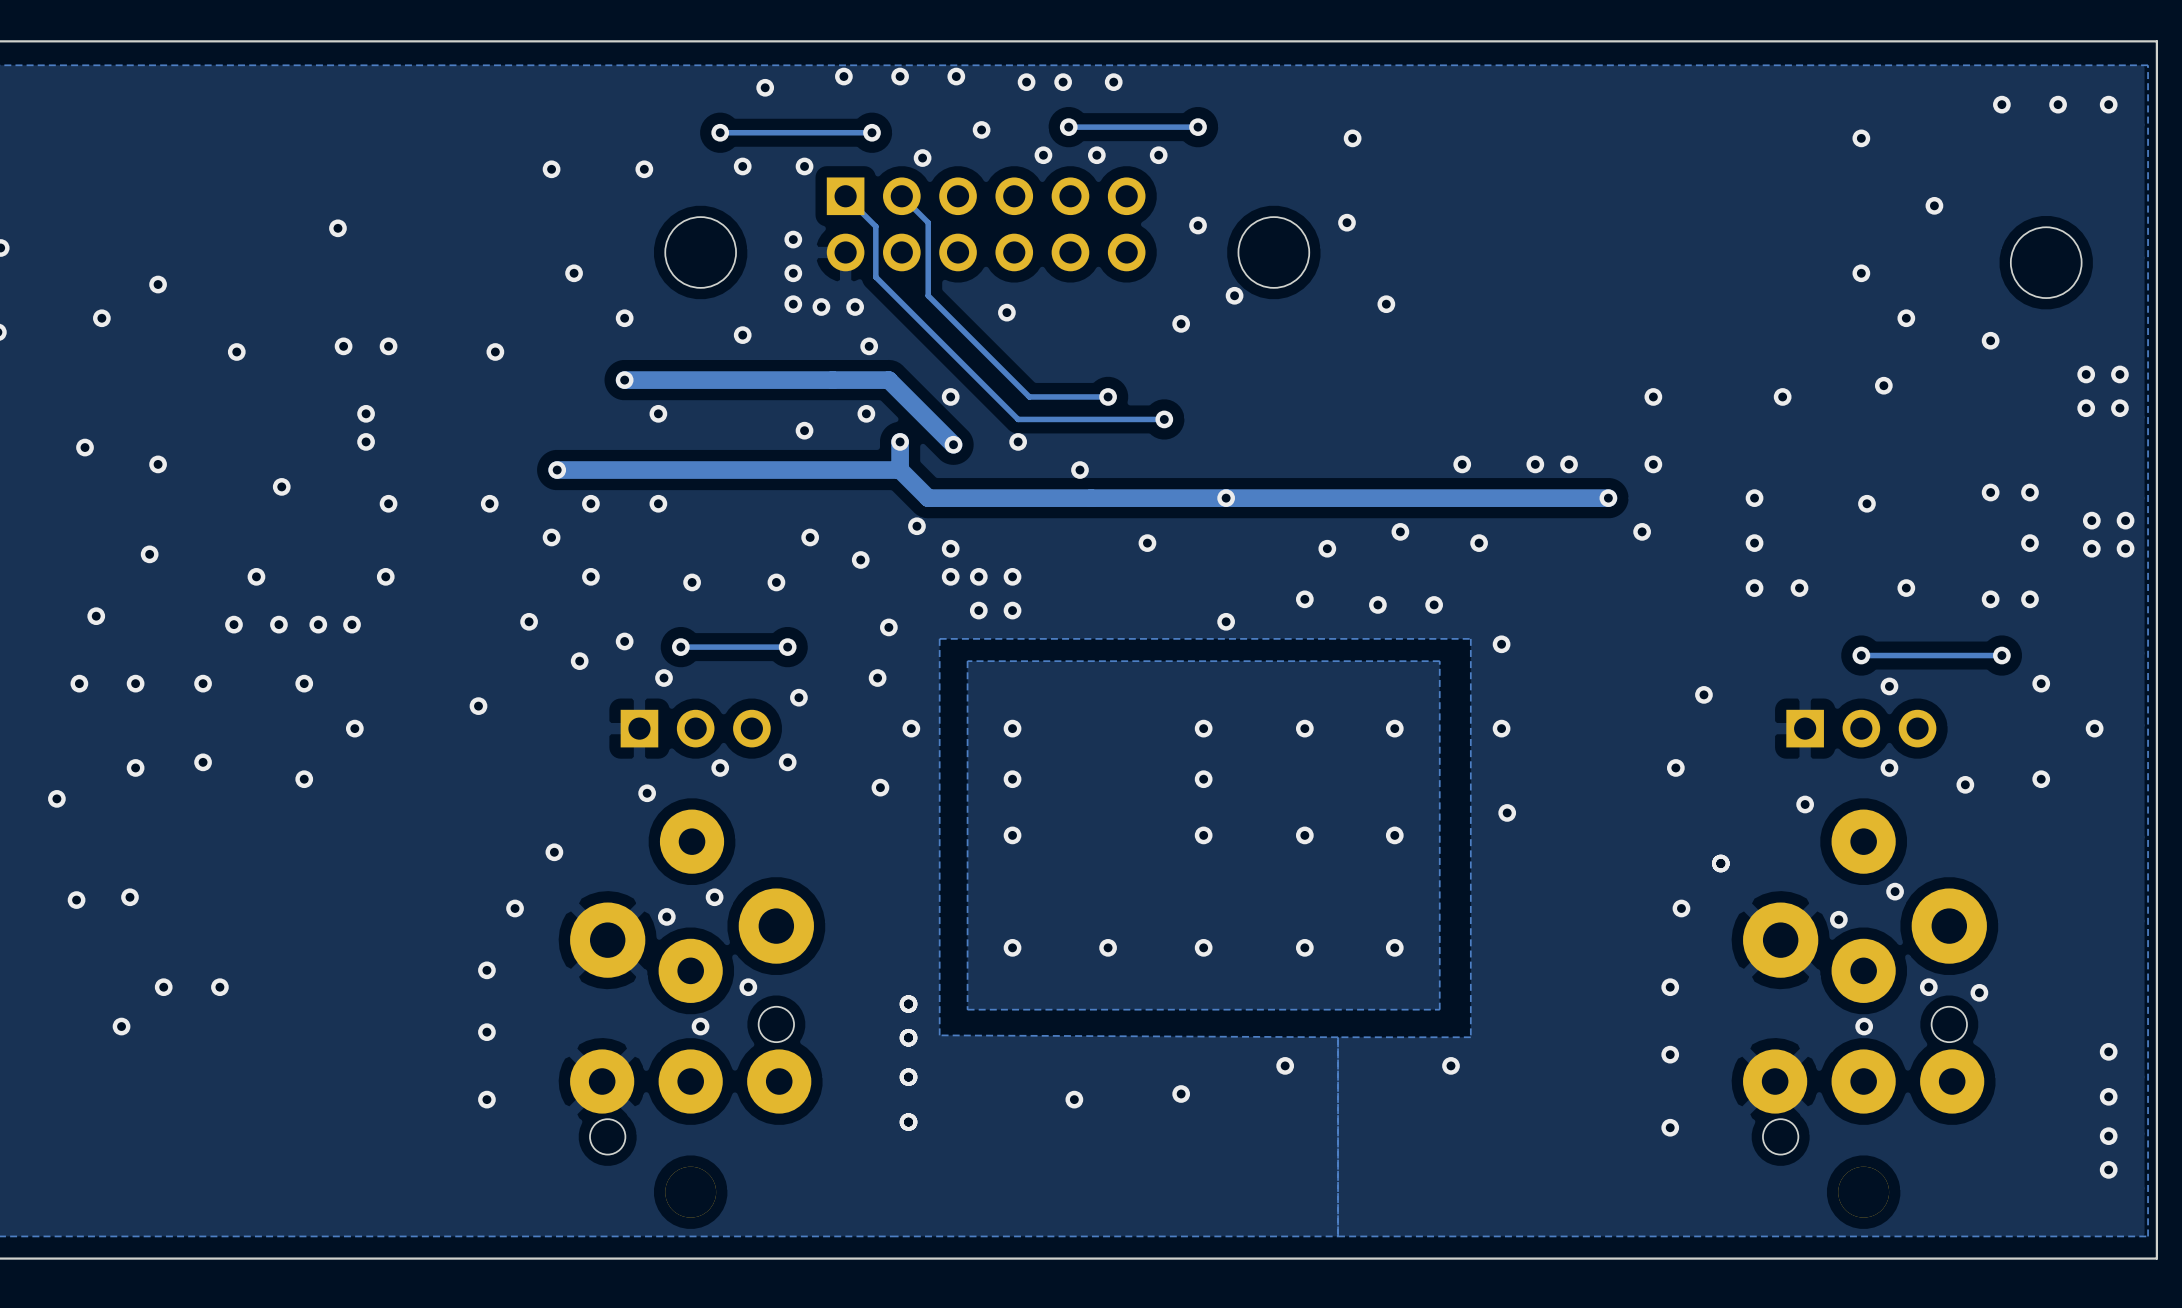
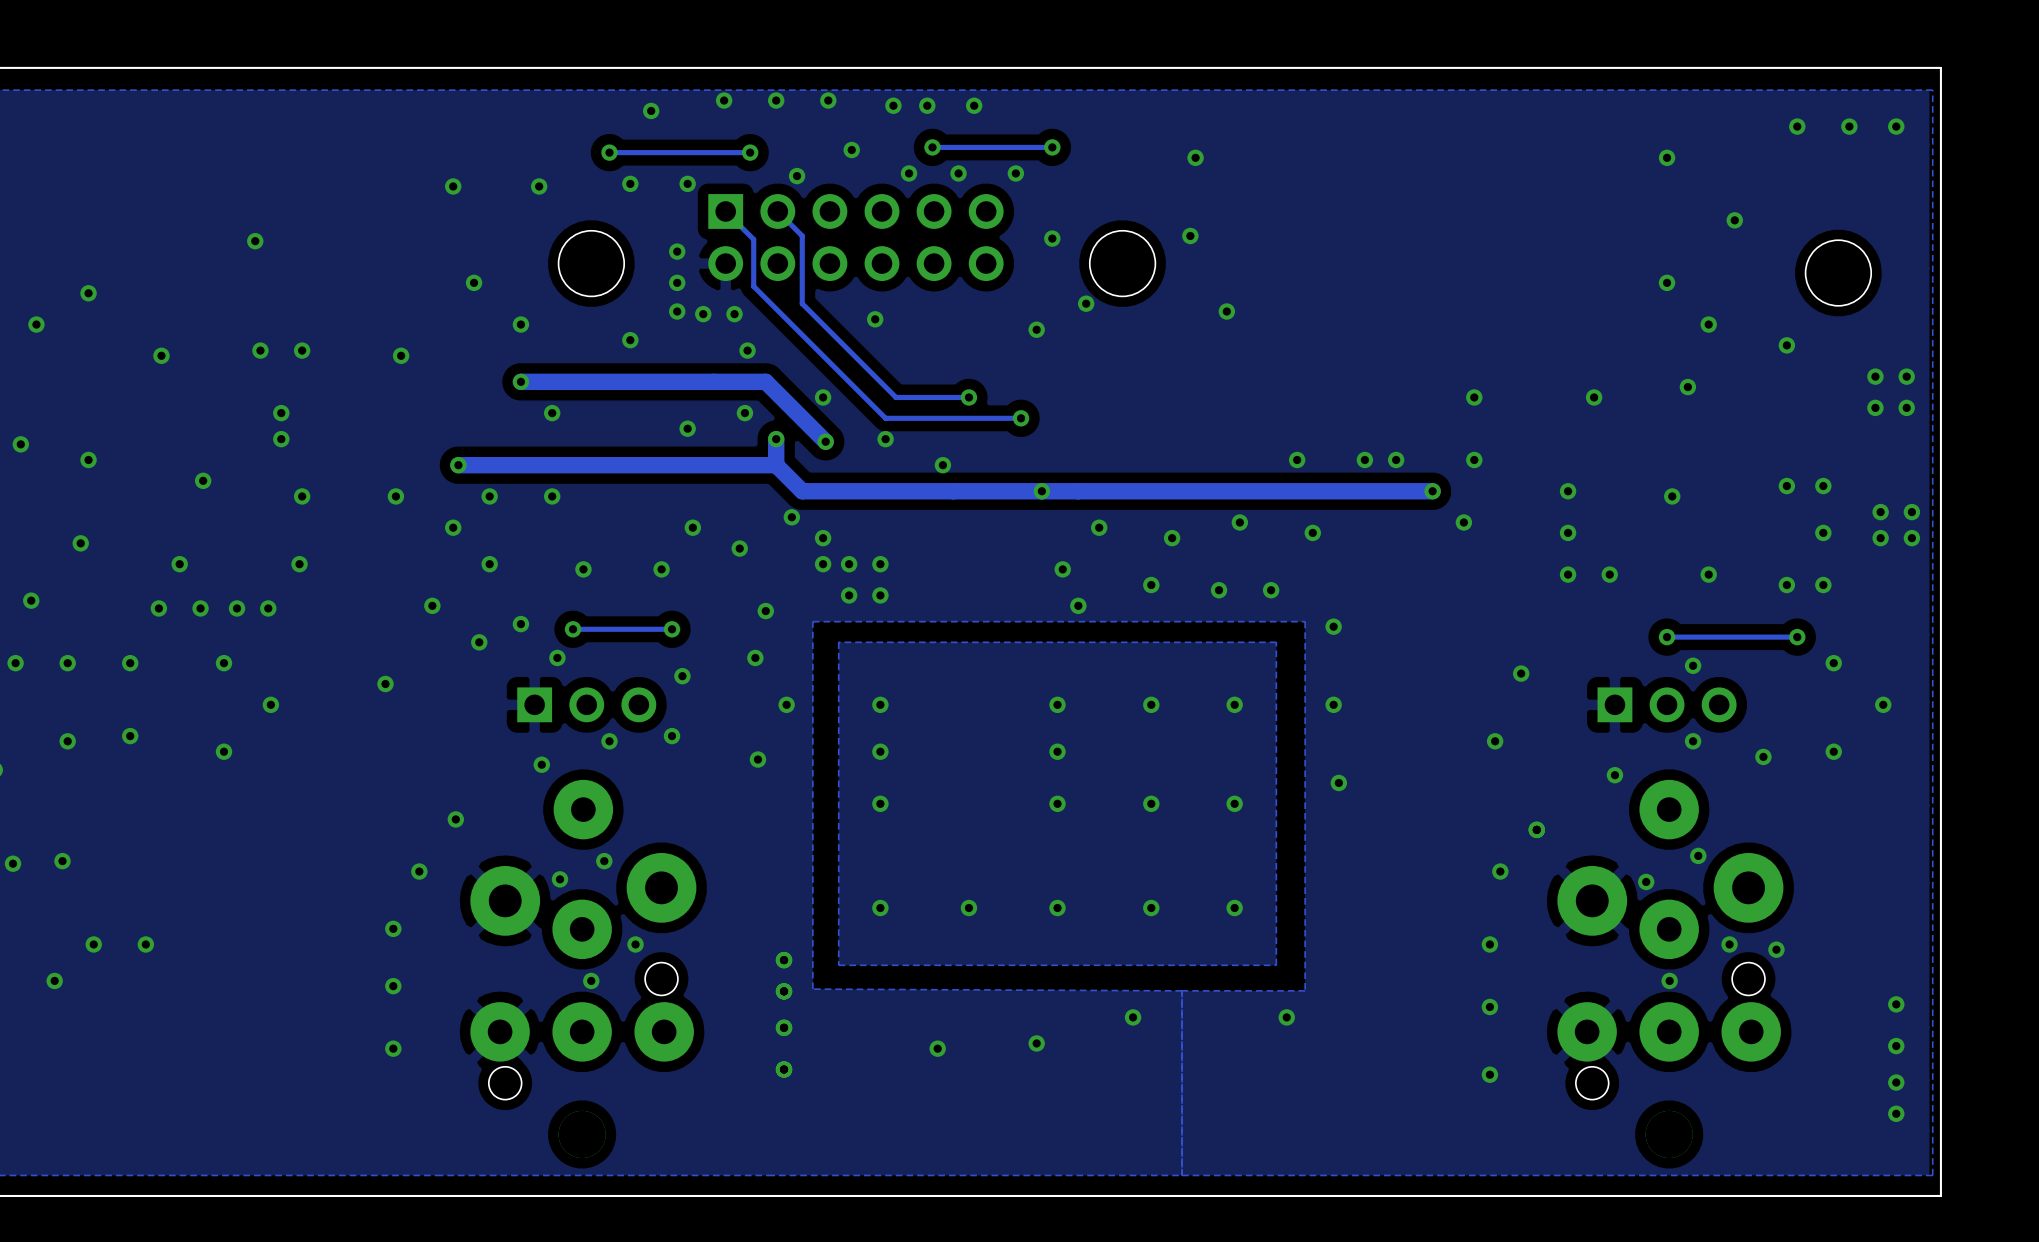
via: none -> (1041, 491)
via: (1226, 498) -> none
via: none -> (1099, 527)
via: (1147, 543) -> none
via: none -> (1062, 569)

